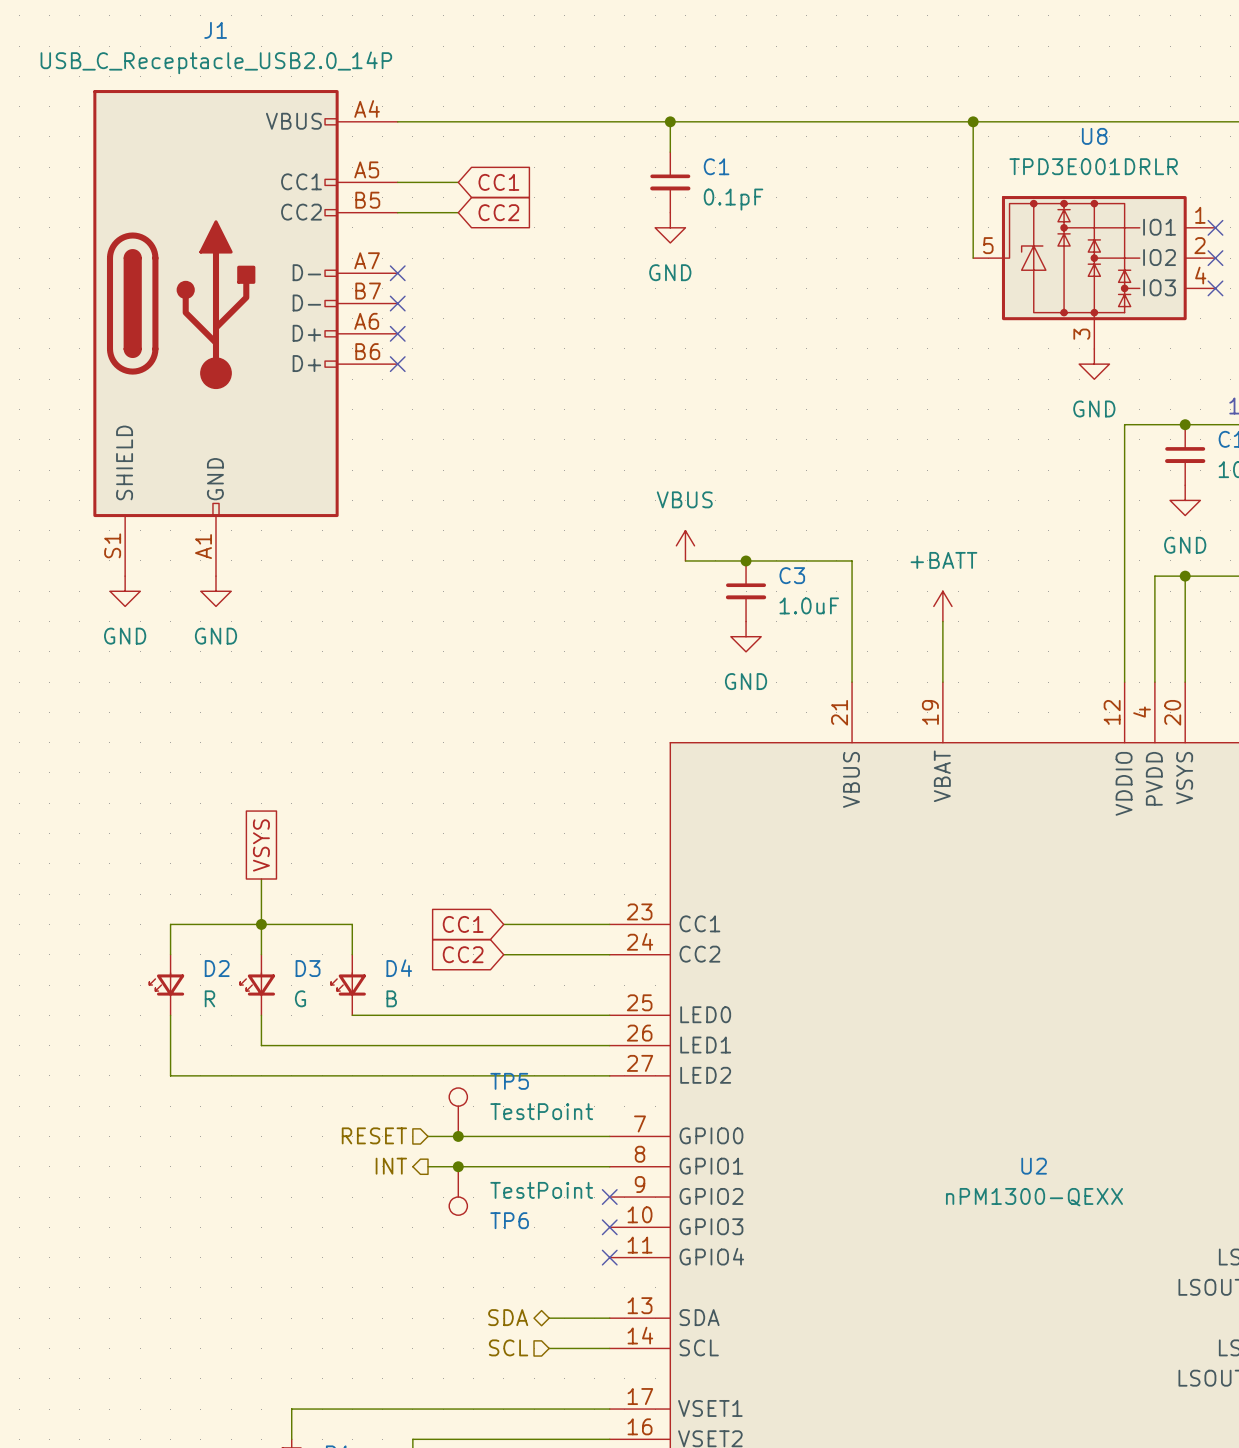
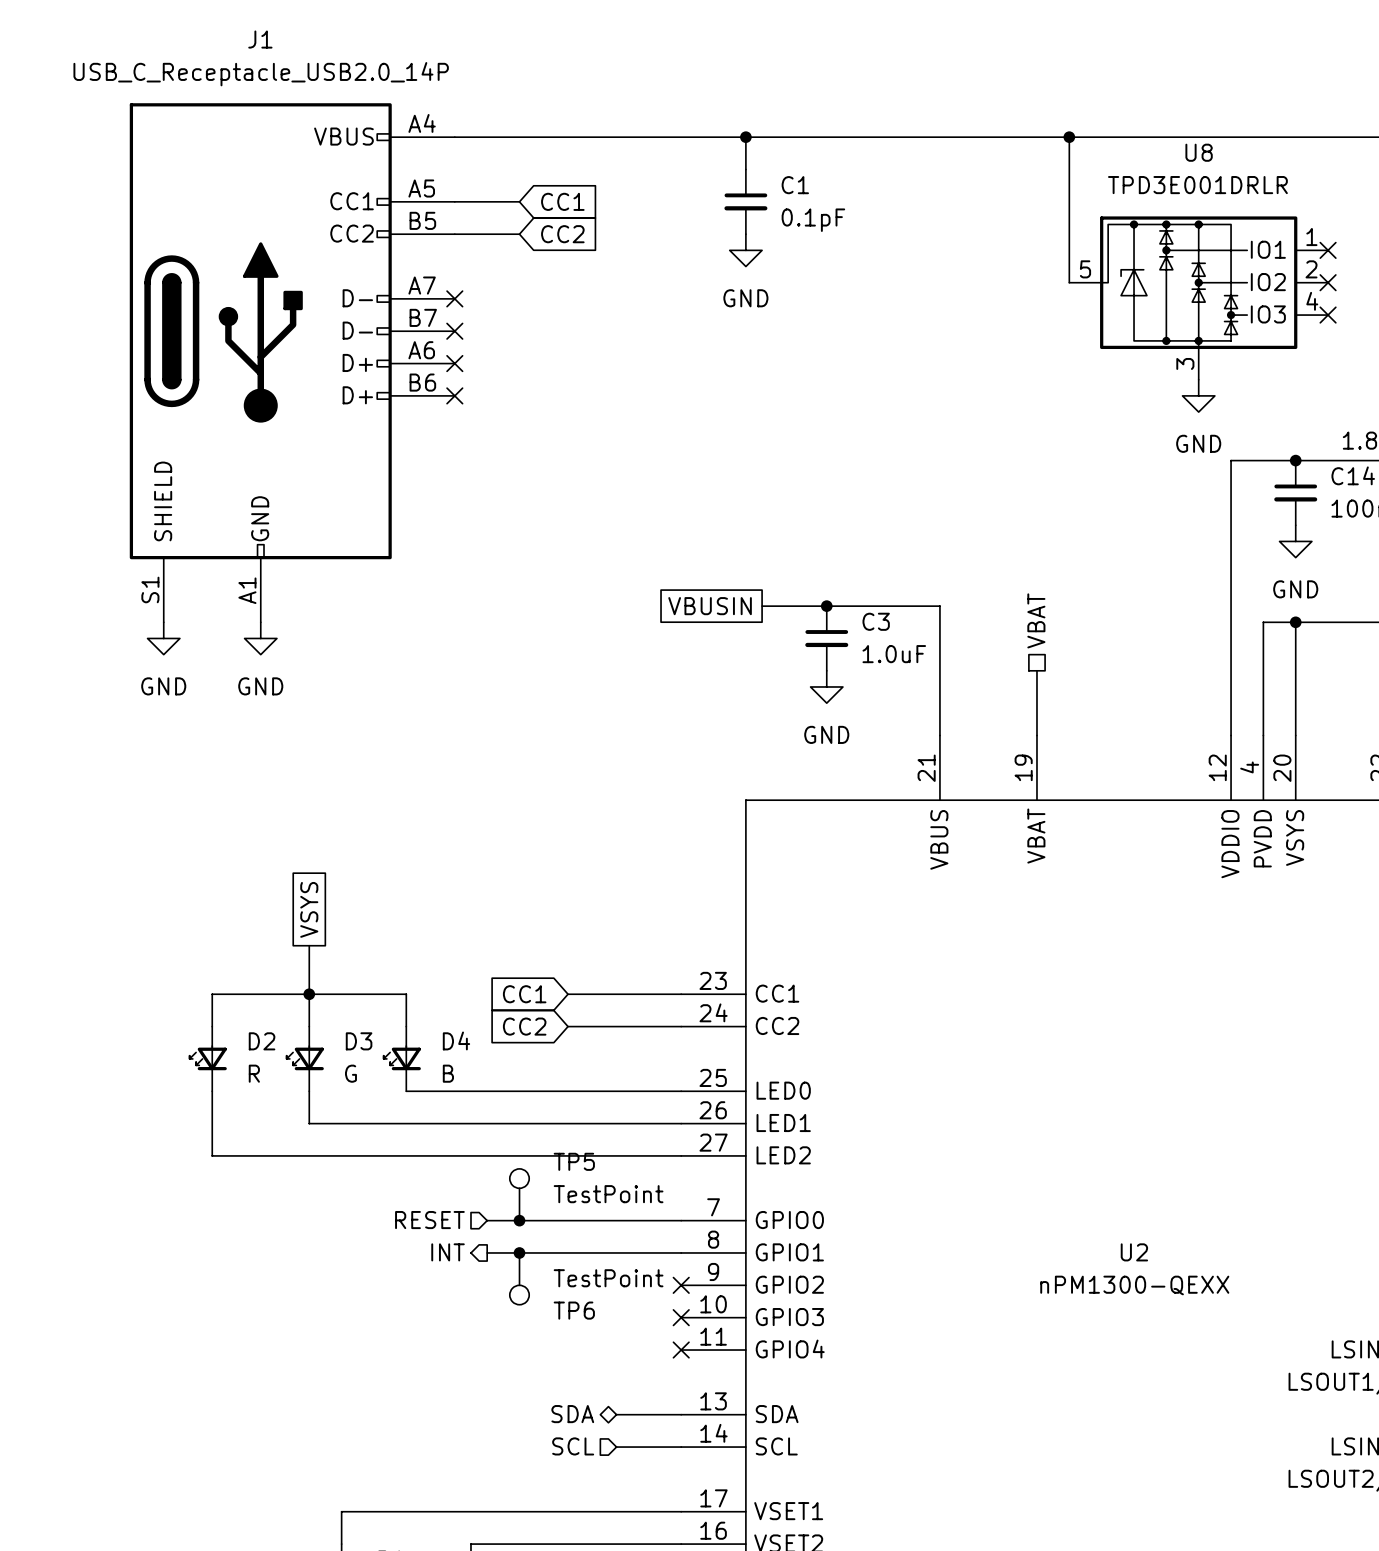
power symbol: VBUS (685, 545) -> none
global label: none -> VBUSIN (710, 606)
hierarchical label: none -> VBAT (1036, 620)
power symbol: +BATT (942, 606) -> none

